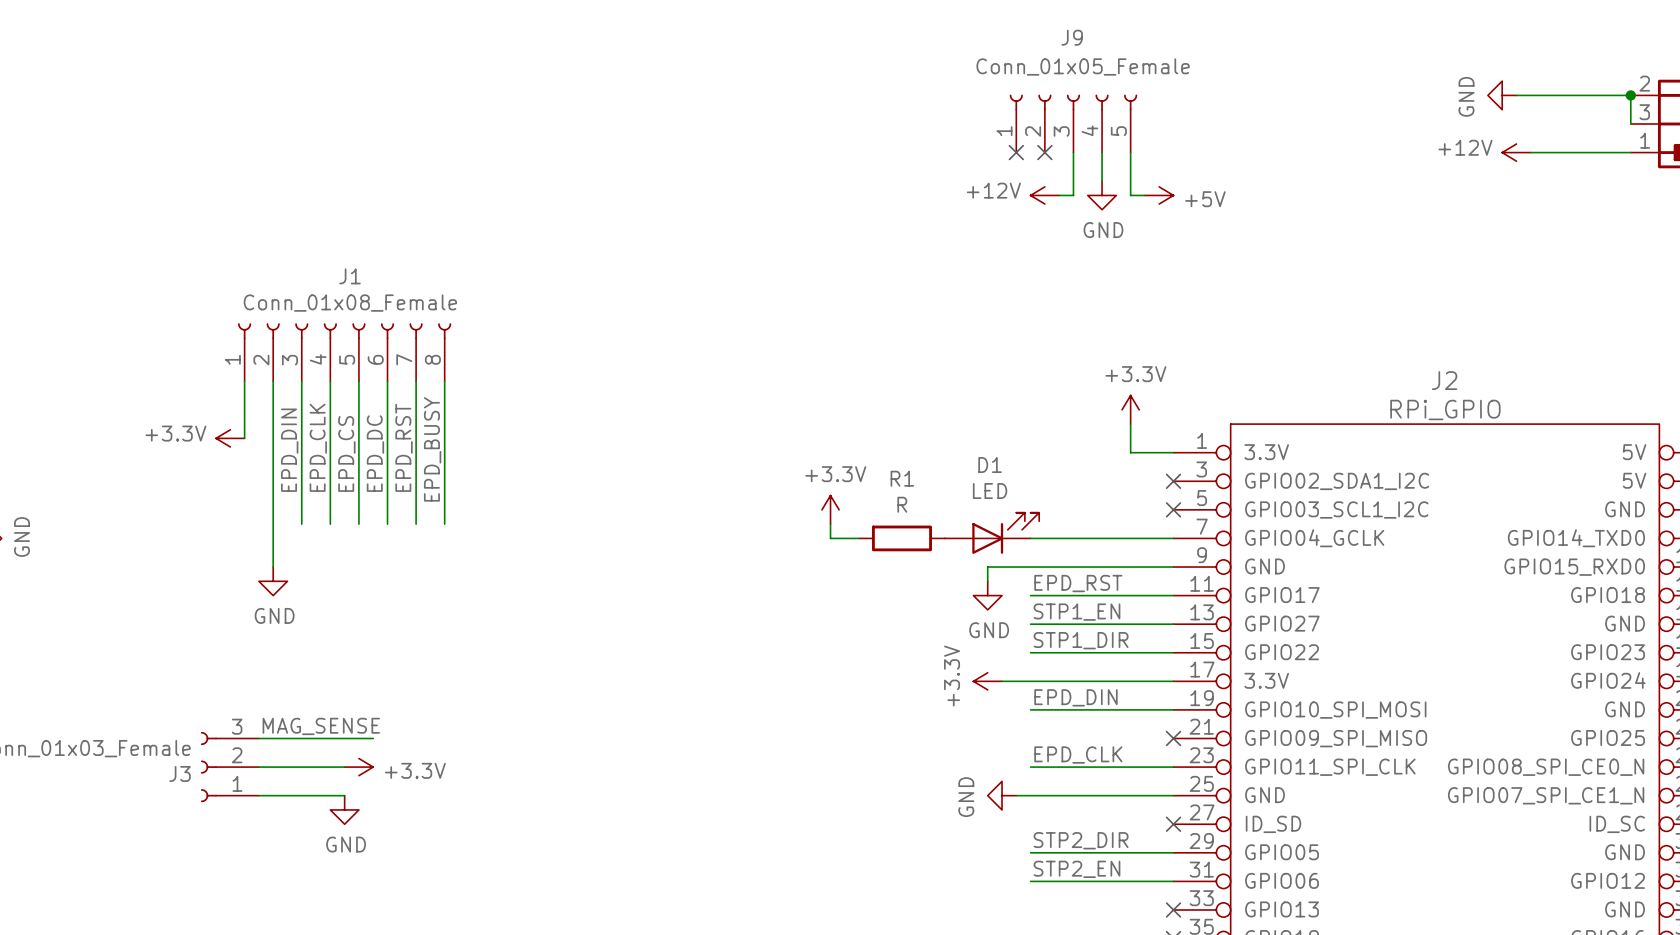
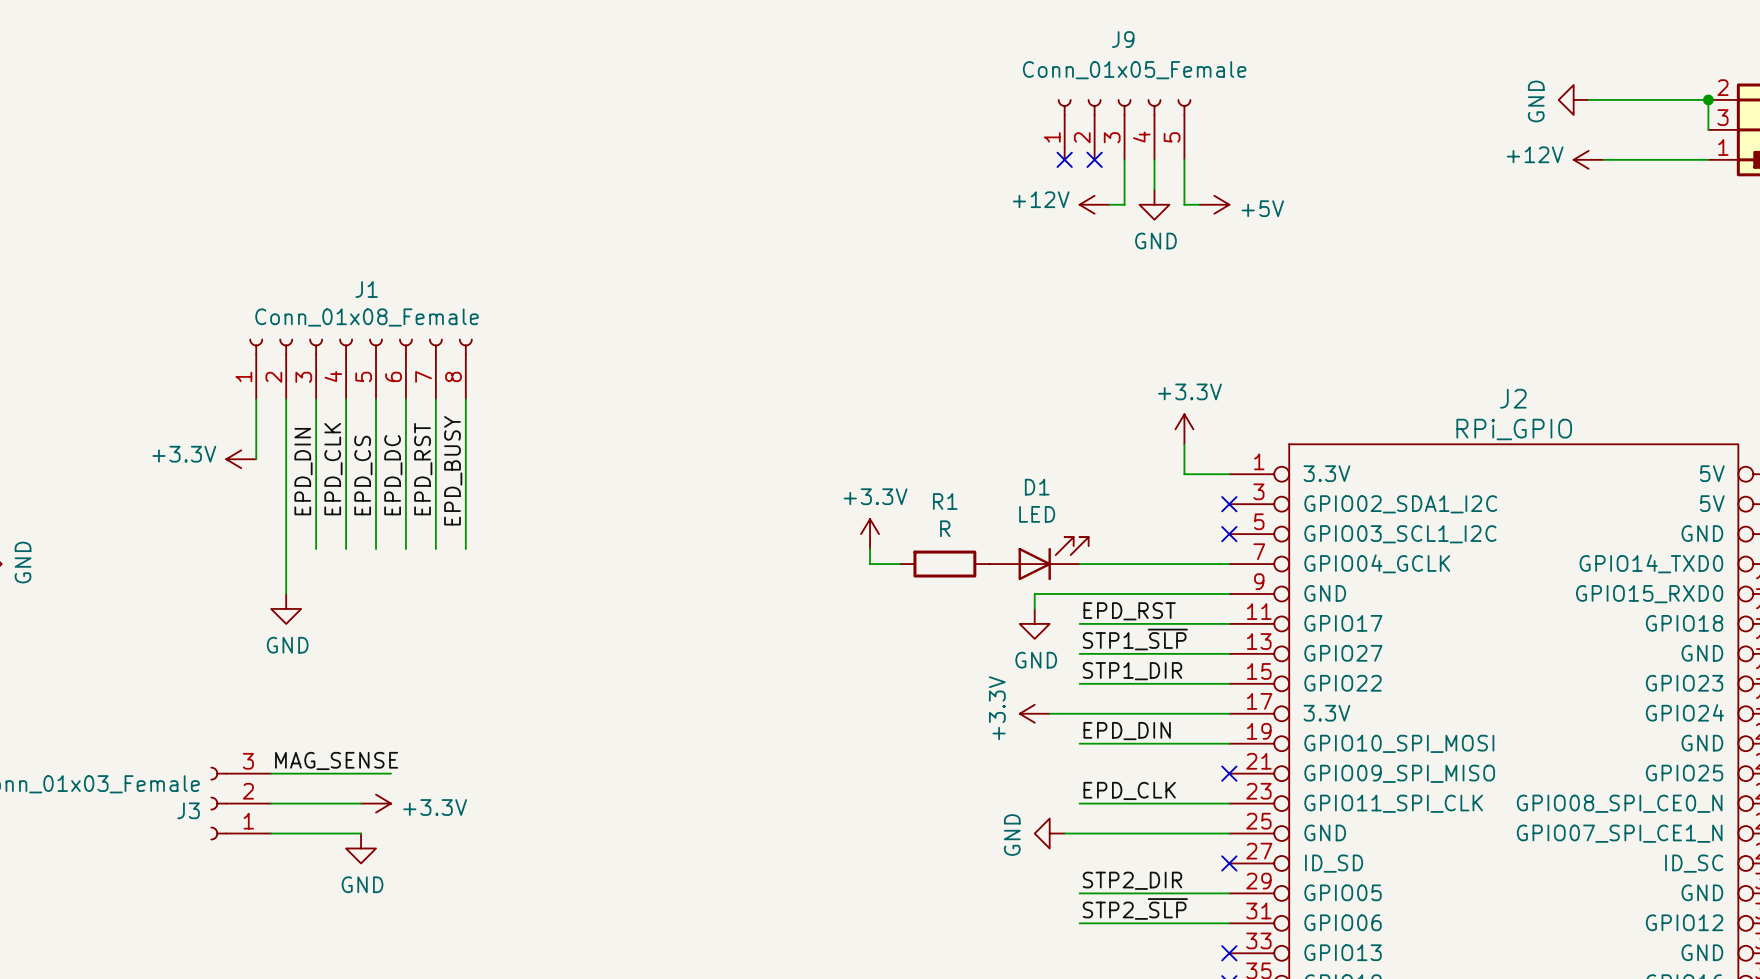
label: STP1_EN (1076, 612) -> STP1_~{SLP} (1135, 639)
label: STP2_EN (1076, 869) -> STP2_~{SLP} (1135, 908)

